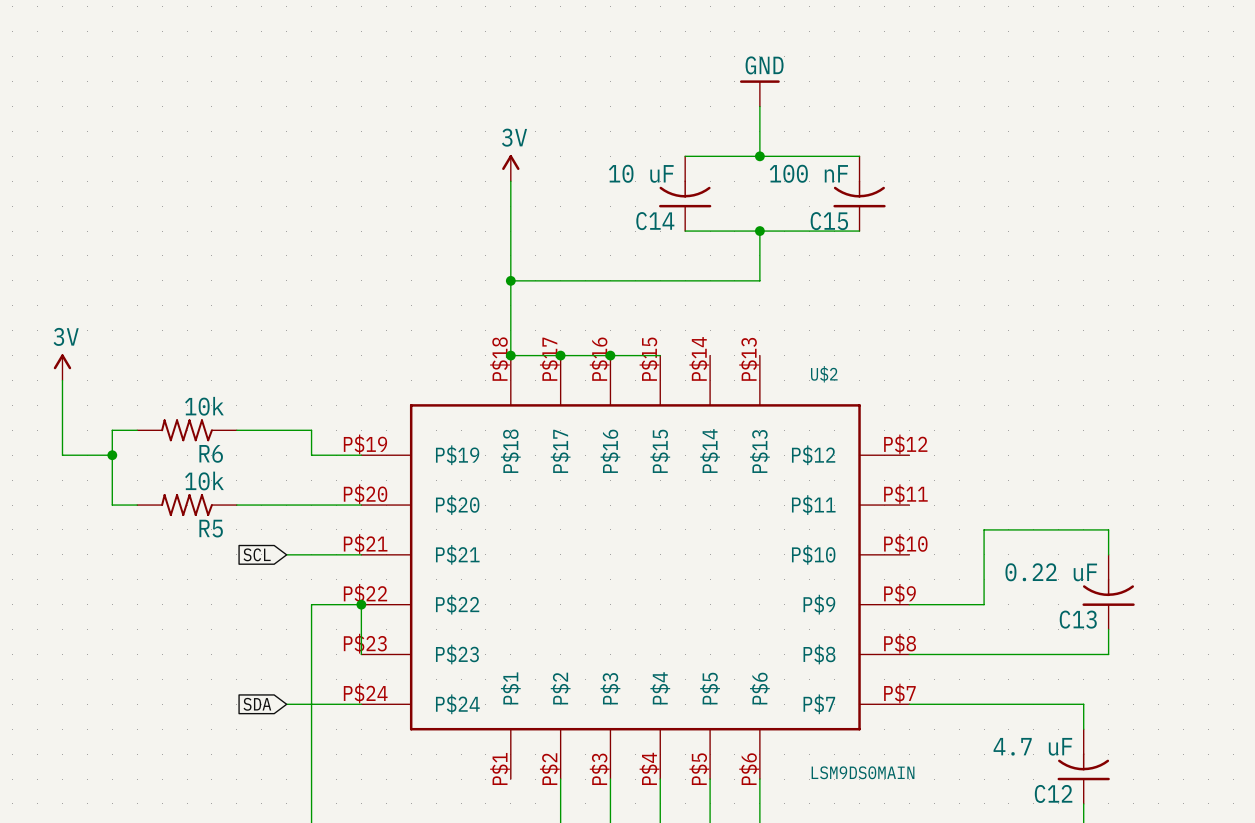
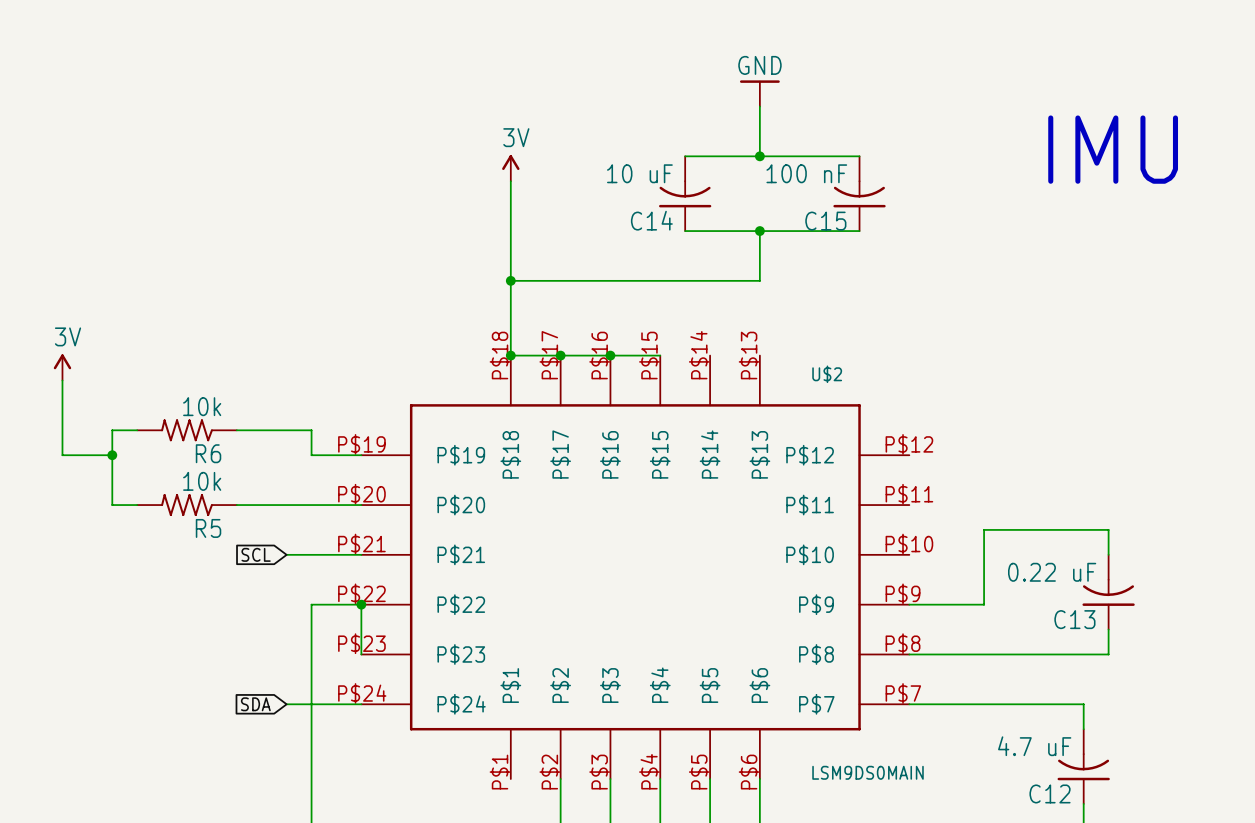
text: none -> IMU (1113, 149)

